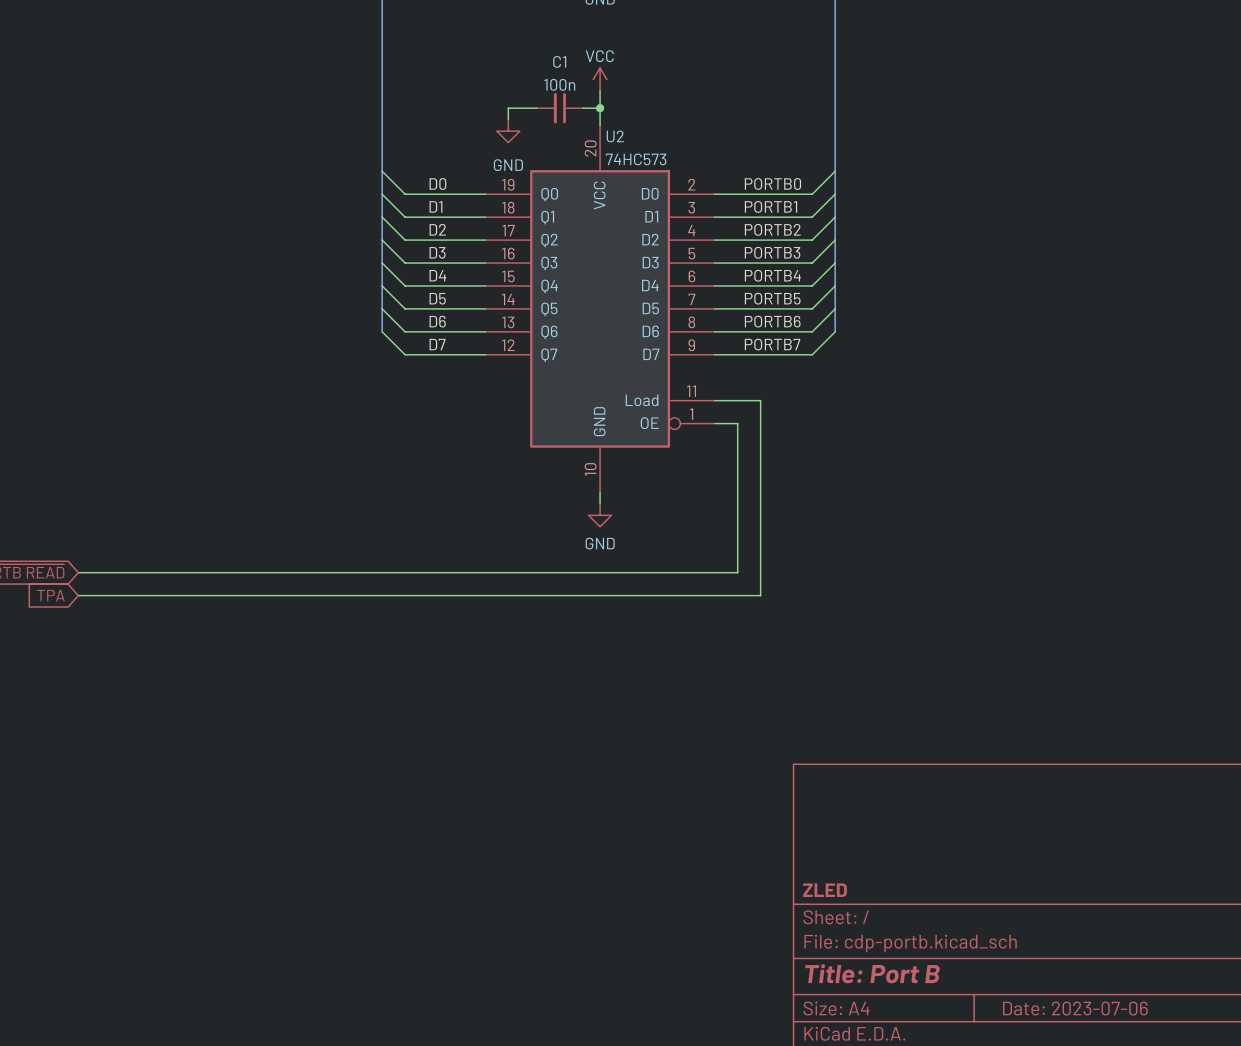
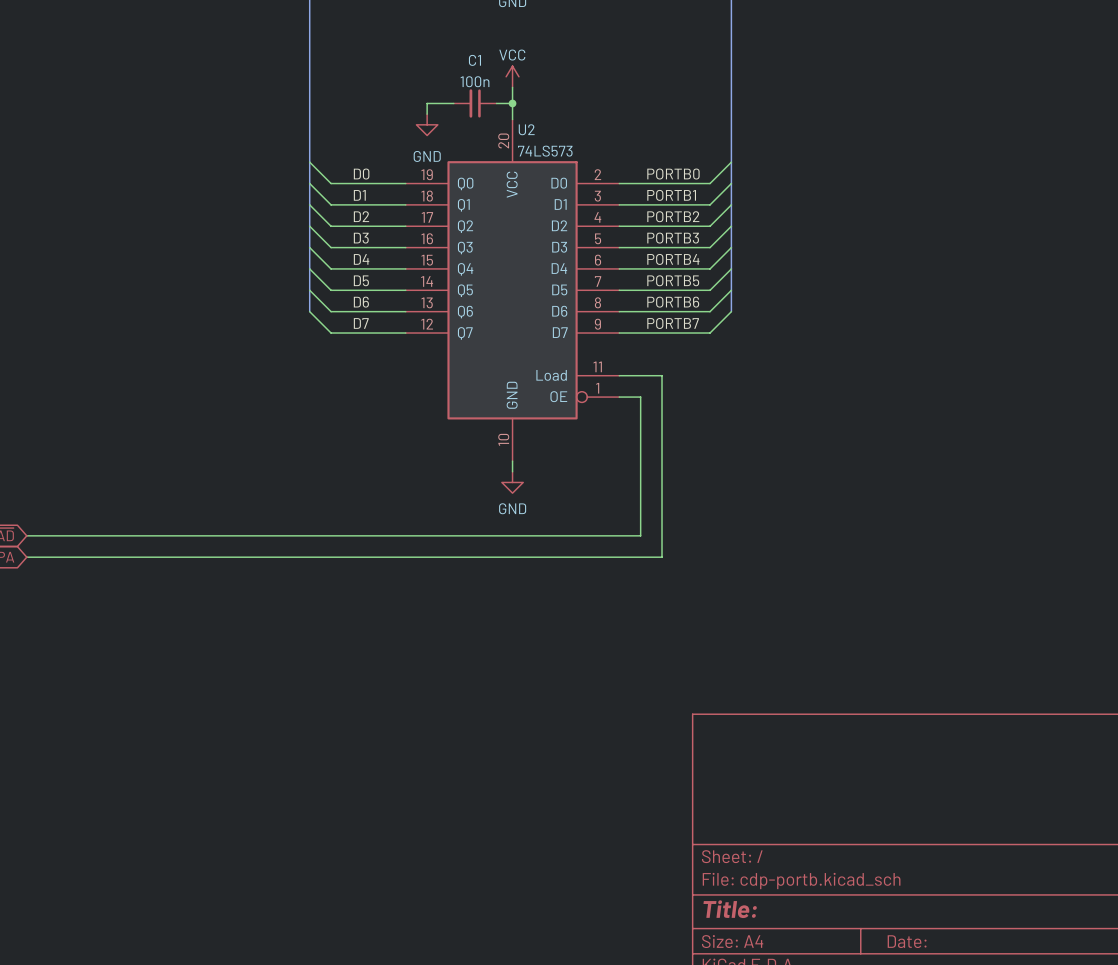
U2 value: 74HC573 (636, 159) -> 74LS573 (545, 151)
title block: ZLED (825, 890) -> none
title block: Title: Port B (872, 973) -> Title: (730, 909)
title block: Date: 2023-07-06 (1075, 1008) -> Date: (907, 941)

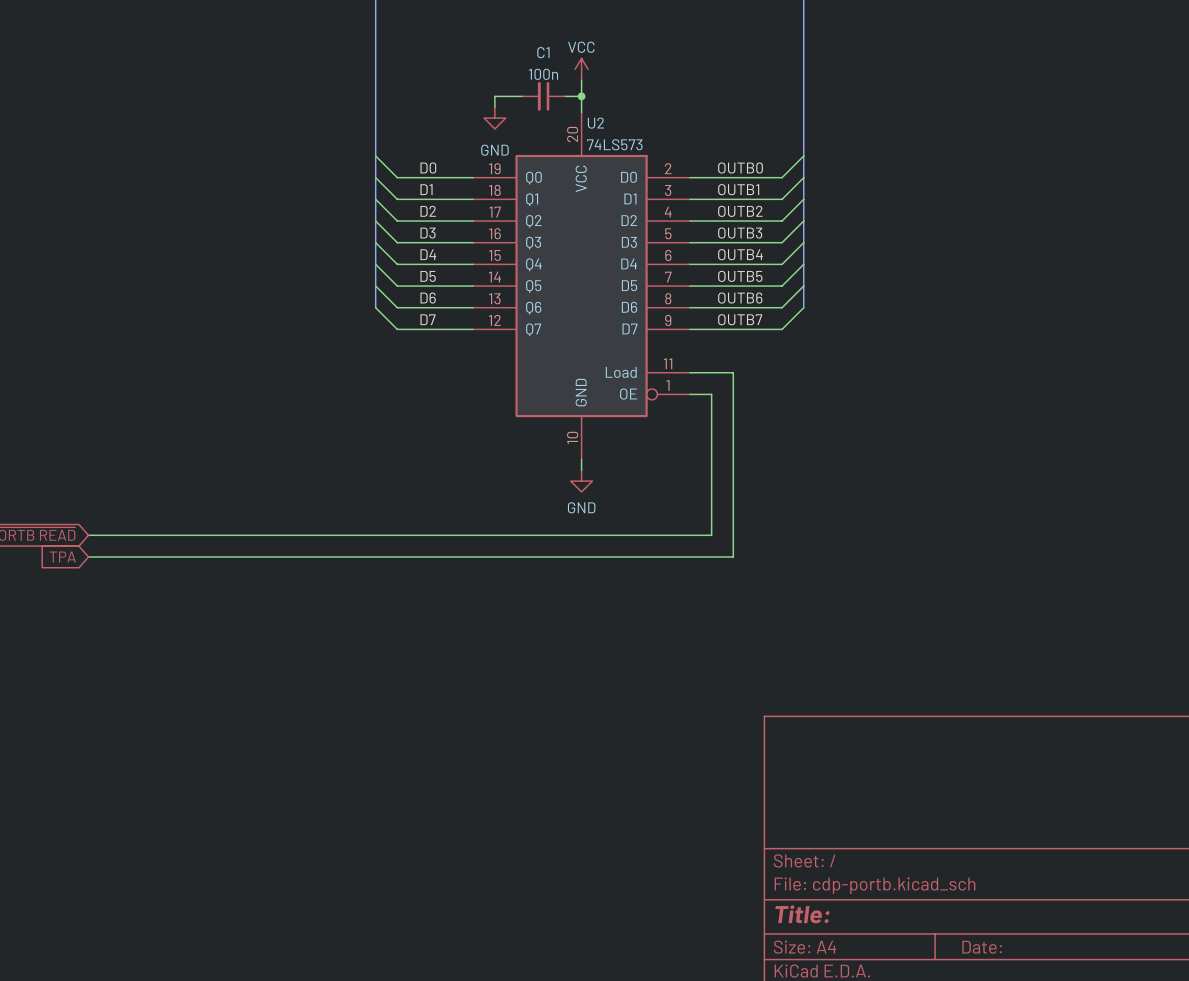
label: PORTB0 (673, 174) -> OUTB0 (740, 168)
label: PORTB1 (671, 195) -> OUTB1 (738, 189)
label: PORTB2 (673, 216) -> OUTB2 (740, 211)
label: PORTB3 (673, 238) -> OUTB3 (740, 233)
label: PORTB4 (673, 259) -> OUTB4 (740, 254)
label: PORTB5 (673, 280) -> OUTB5 (740, 276)
label: PORTB6 (673, 302) -> OUTB6 (740, 298)
label: PORTB7 (673, 323) -> OUTB7 (740, 319)

